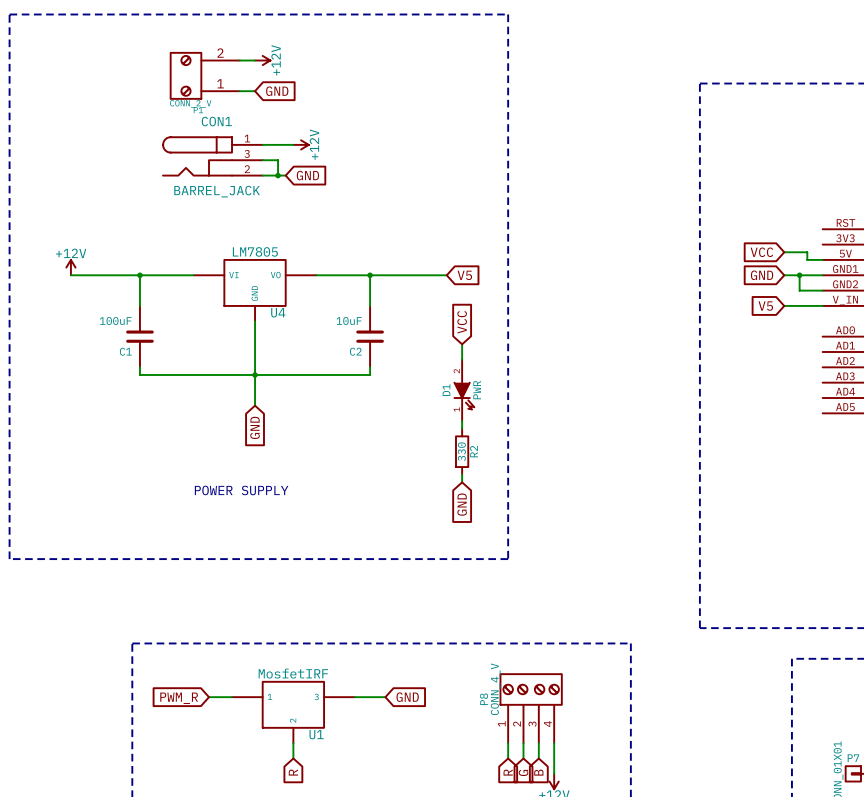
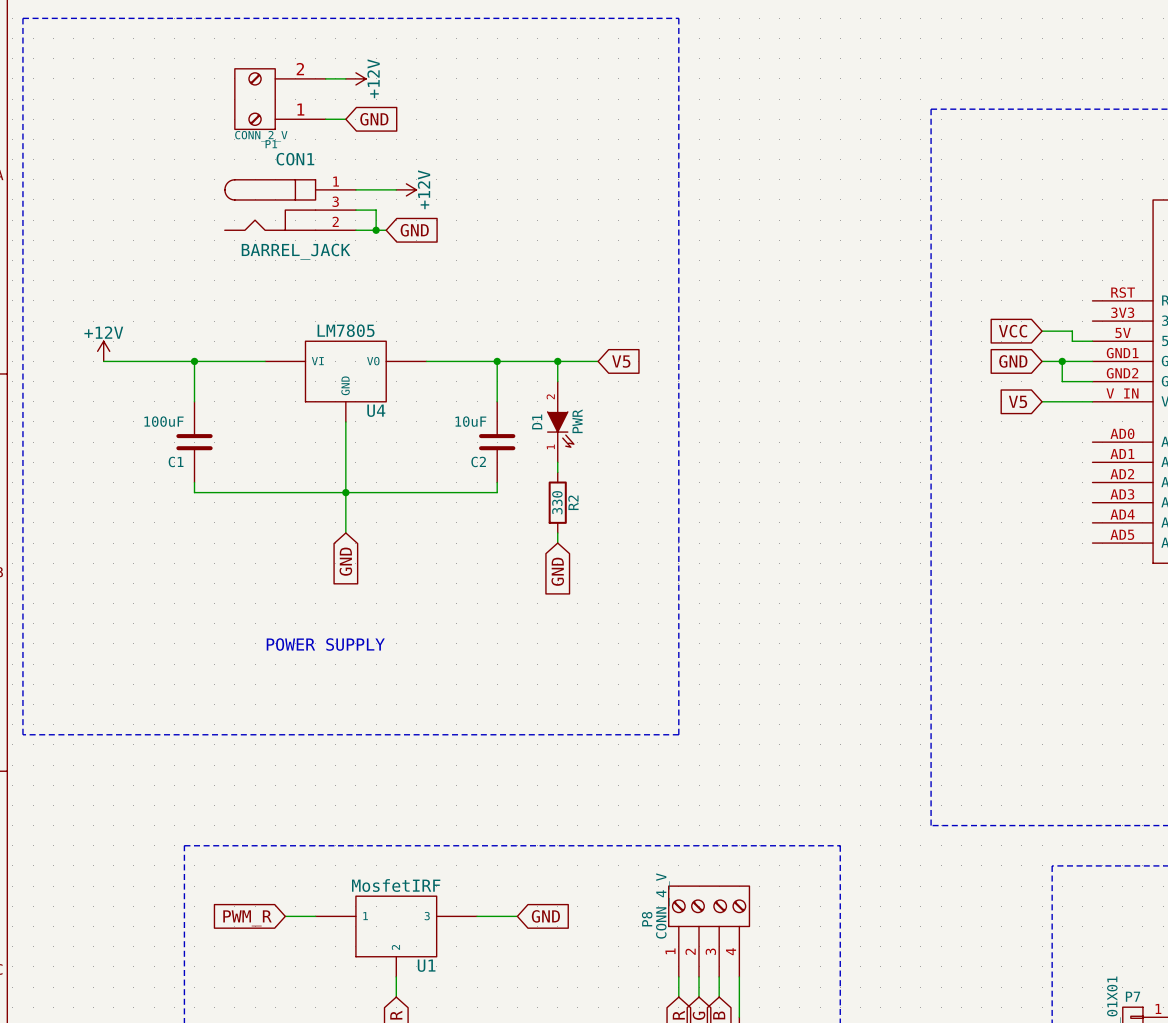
junction: none -> (557, 361)
global label: VCC (462, 322) -> none
wire: (462, 344) (462, 359) -> (557, 361) (557, 381)
D1 position: (464, 390) -> (560, 421)
wire: (462, 421) (462, 428) -> (557, 532) (557, 543)
R2 position: (462, 451) -> (557, 502)
wire: (462, 474) (462, 482) -> (557, 462) (557, 472)
global label position: GND (462, 504) -> GND (557, 571)

